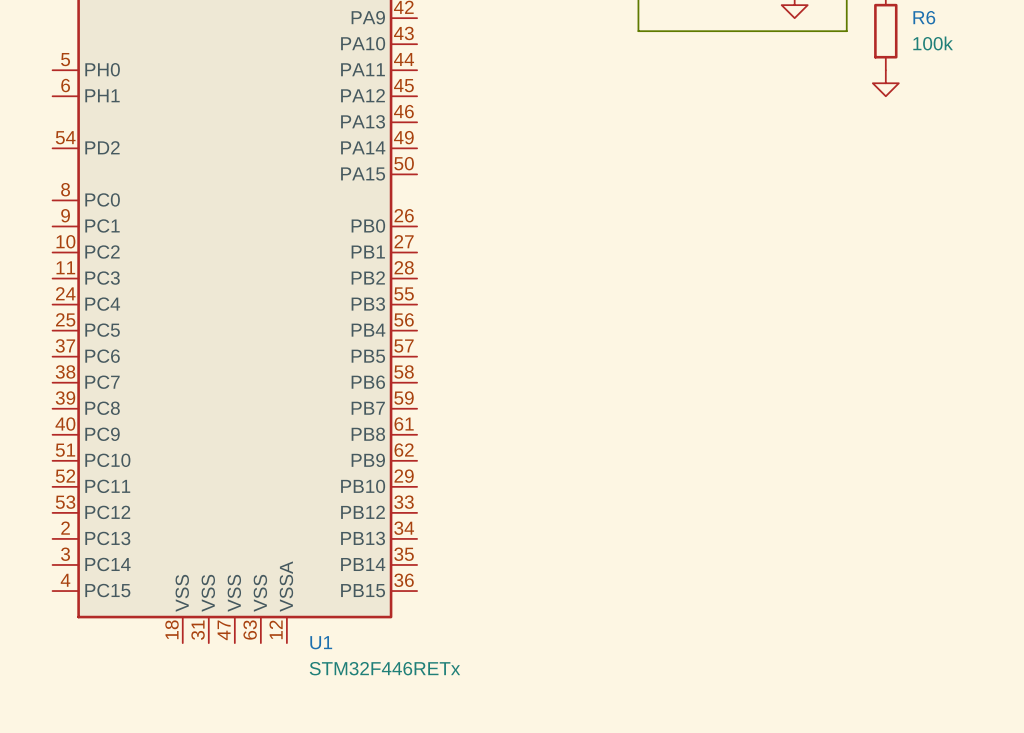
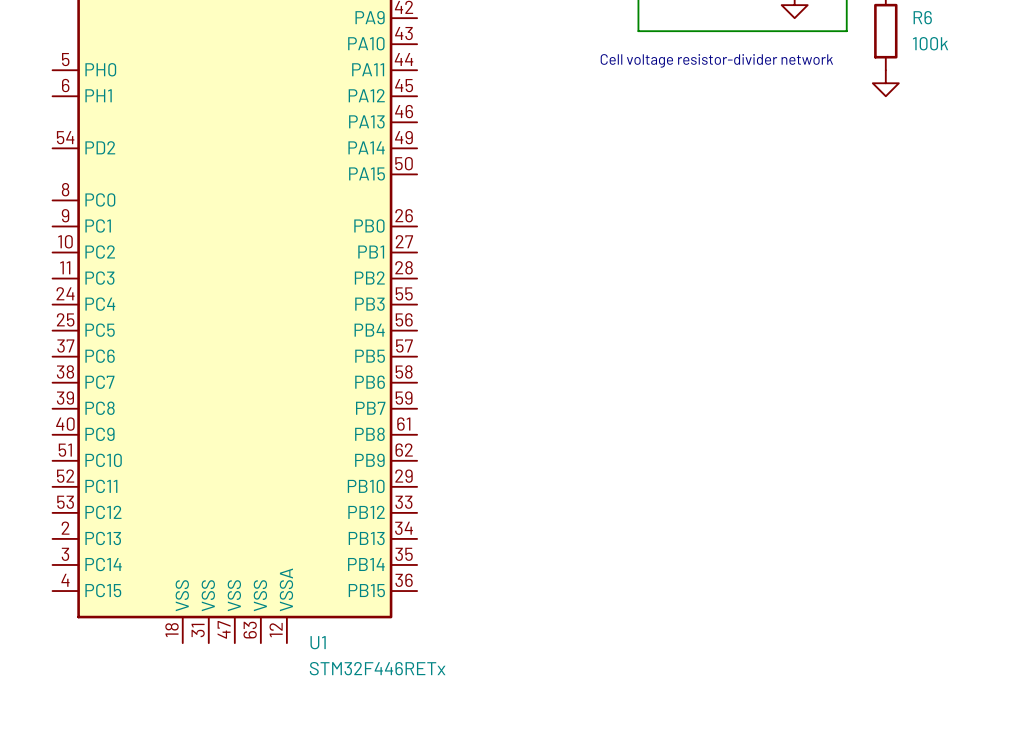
text: none -> Cell voltage resistor-divider network (716, 60)

